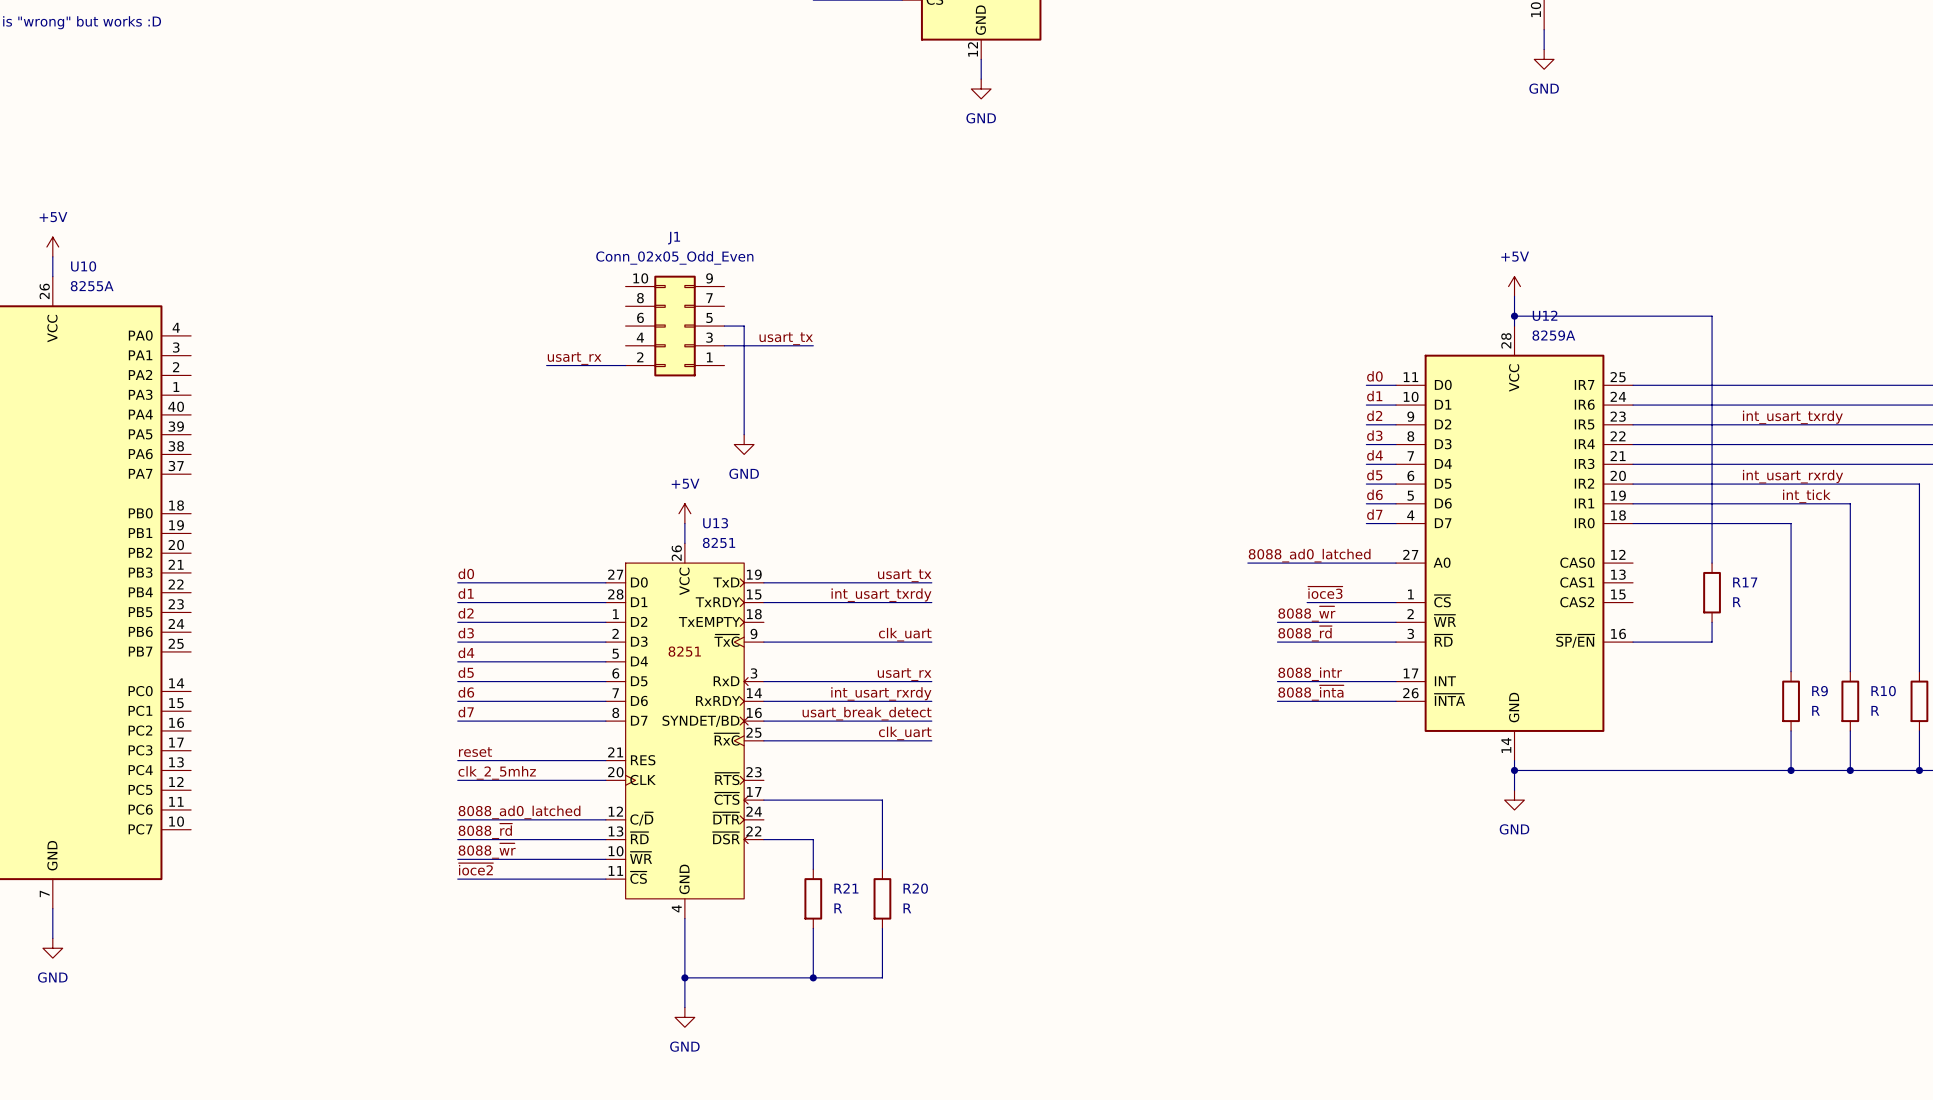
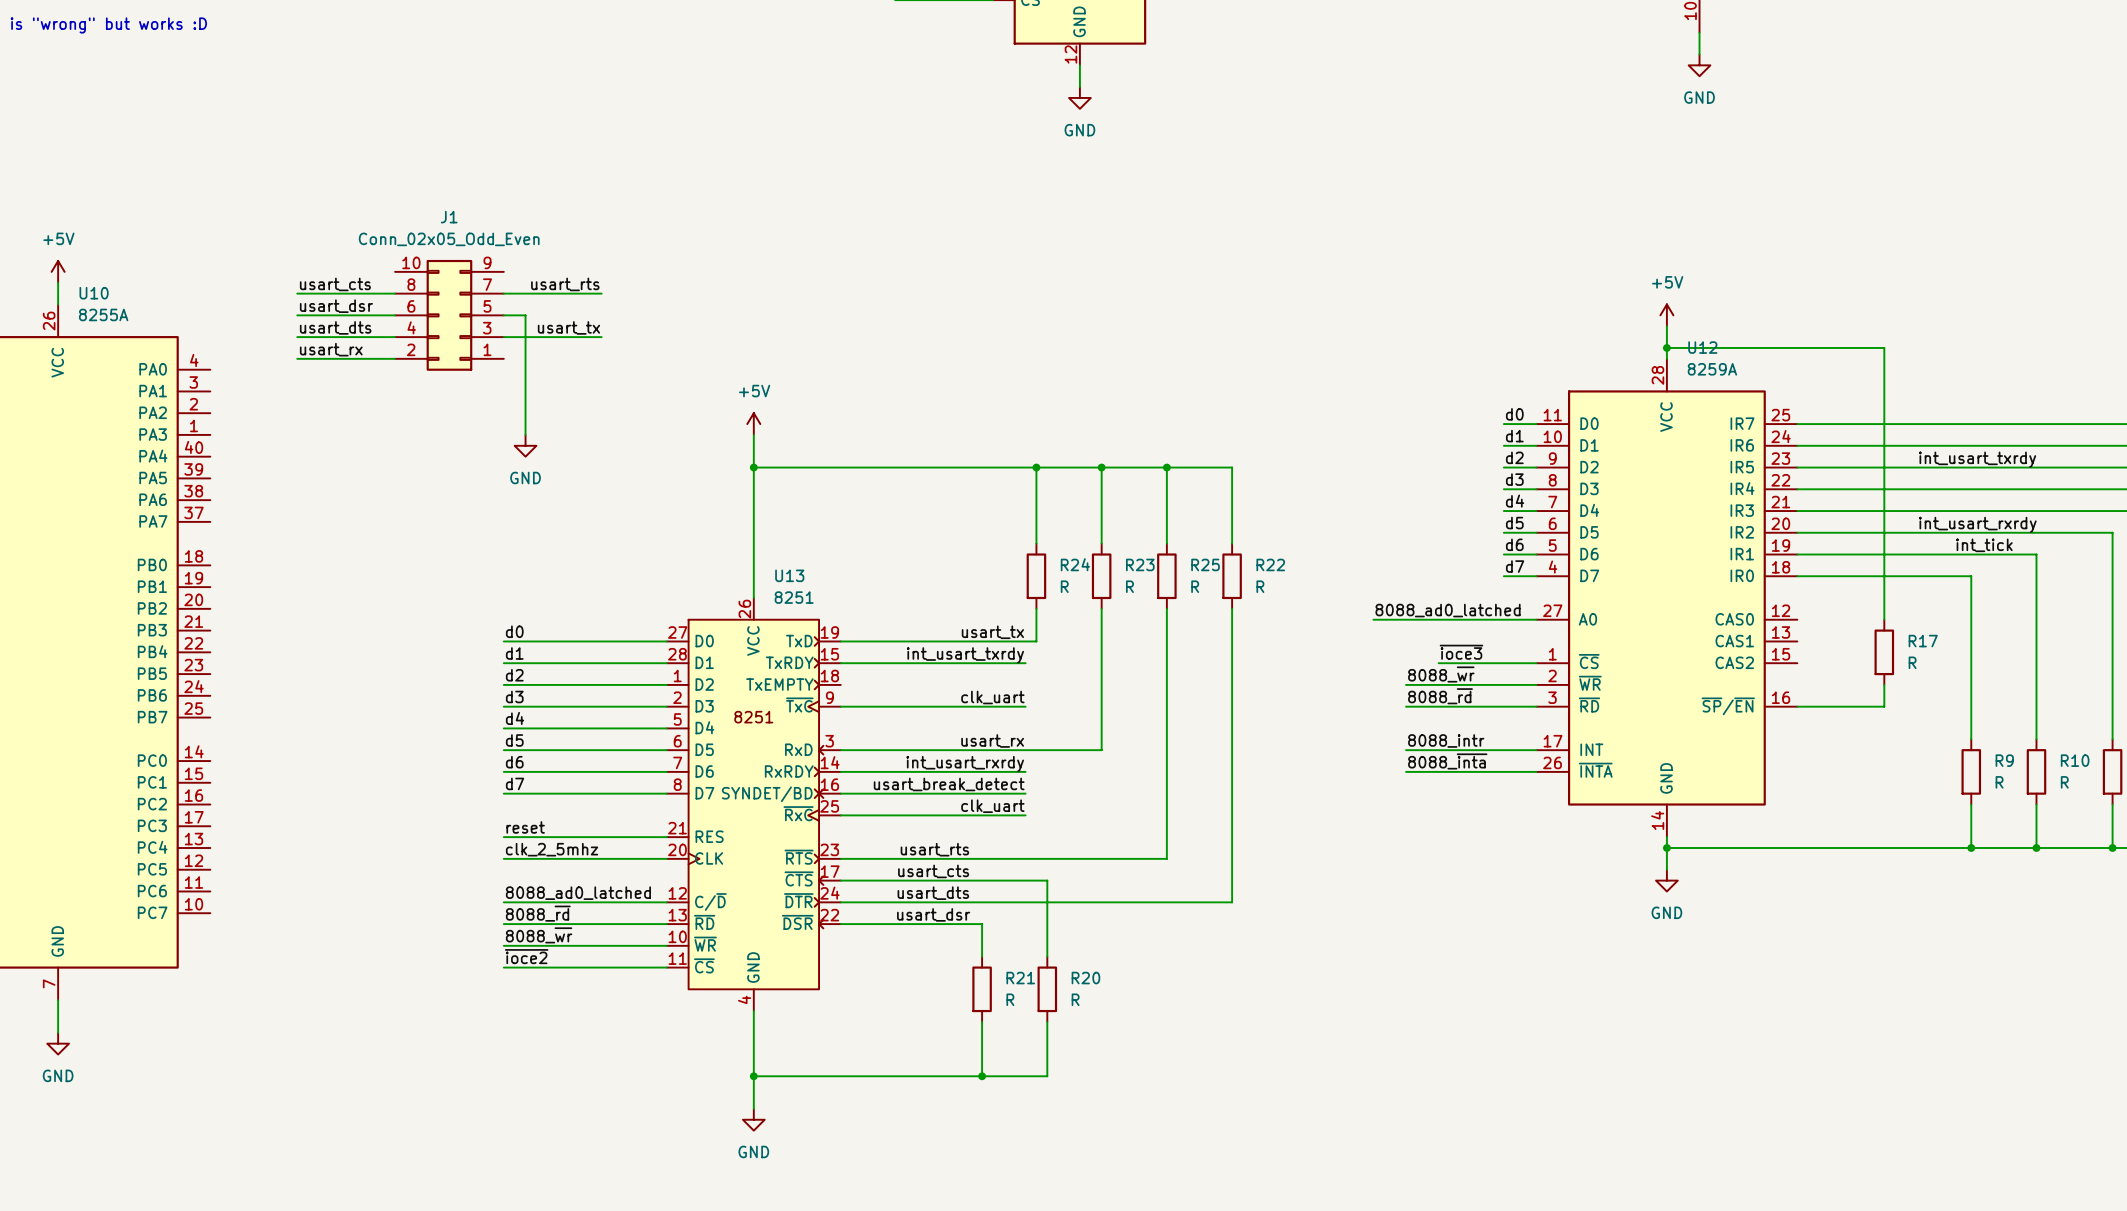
label: none -> usart_cts (335, 284)
label: none -> usart_rts (565, 284)
wire: none -> (297, 293) (395, 293)
wire: none -> (503, 293) (601, 293)
label: none -> usart_dsr (336, 306)
wire: none -> (297, 315) (395, 315)
wire: none -> (503, 315) (525, 315) (525, 434)
label: none -> usart_dts (335, 327)
label: none -> usart_tx (568, 327)
wire: none -> (297, 337) (395, 337)
wire: none -> (503, 337) (601, 337)
label: none -> usart_rx (331, 349)
wire: none -> (297, 358) (395, 358)
J1 position: (675, 326) -> (449, 315)
wire: (724, 326) (744, 326) (744, 434) -> none
label: usart_tx (786, 338) -> none
wire: (724, 345) (813, 345) -> none
label: usart_rx (574, 358) -> none
wire: (546, 365) (625, 365) -> none
wire: none -> (753, 434) (753, 576)
power symbol: none -> GND (525, 445)
wire: none -> (753, 467) (1232, 467) (1232, 543)
junction: none -> (753, 467)
wire: none -> (1036, 467) (1036, 543)
junction: none -> (1036, 467)
wire: none -> (1101, 467) (1101, 543)
junction: none -> (1101, 467)
wire: none -> (1166, 467) (1166, 543)
junction: none -> (1166, 467)
power symbol: GND (744, 444) -> none
power symbol position: +5V (684, 513) -> +5V (753, 424)
R24: none -> R (1036, 576)
R23: none -> R (1101, 576)
R25: none -> R (1166, 576)
R22: none -> R (1232, 576)
wire: none -> (1036, 608) (1036, 641) (1025, 641)
wire: none -> (1101, 608) (1101, 750) (1025, 750)
wire: none -> (1166, 608) (1166, 858) (840, 858)
wire: none -> (1232, 608) (1232, 902) (840, 902)
label: none -> usart_rts (934, 849)
label: none -> usart_cts (933, 871)
wire: (882, 800) (882, 869) -> (971, 880) (1047, 880) (1047, 956)
label: none -> usart_dts (933, 893)
label: none -> usart_dsr (933, 914)
wire: (813, 839) (813, 869) -> (895, 924) (982, 924) (982, 956)
R21 position: (813, 898) -> (982, 989)
R20 position: (882, 898) -> (1047, 989)
wire: (813, 928) (813, 977) -> (982, 1021) (982, 1076)
wire: (882, 928) (882, 977) -> (1047, 1021) (1047, 1076) (971, 1076)
junction: (813, 977) -> none
junction: none -> (982, 1076)

